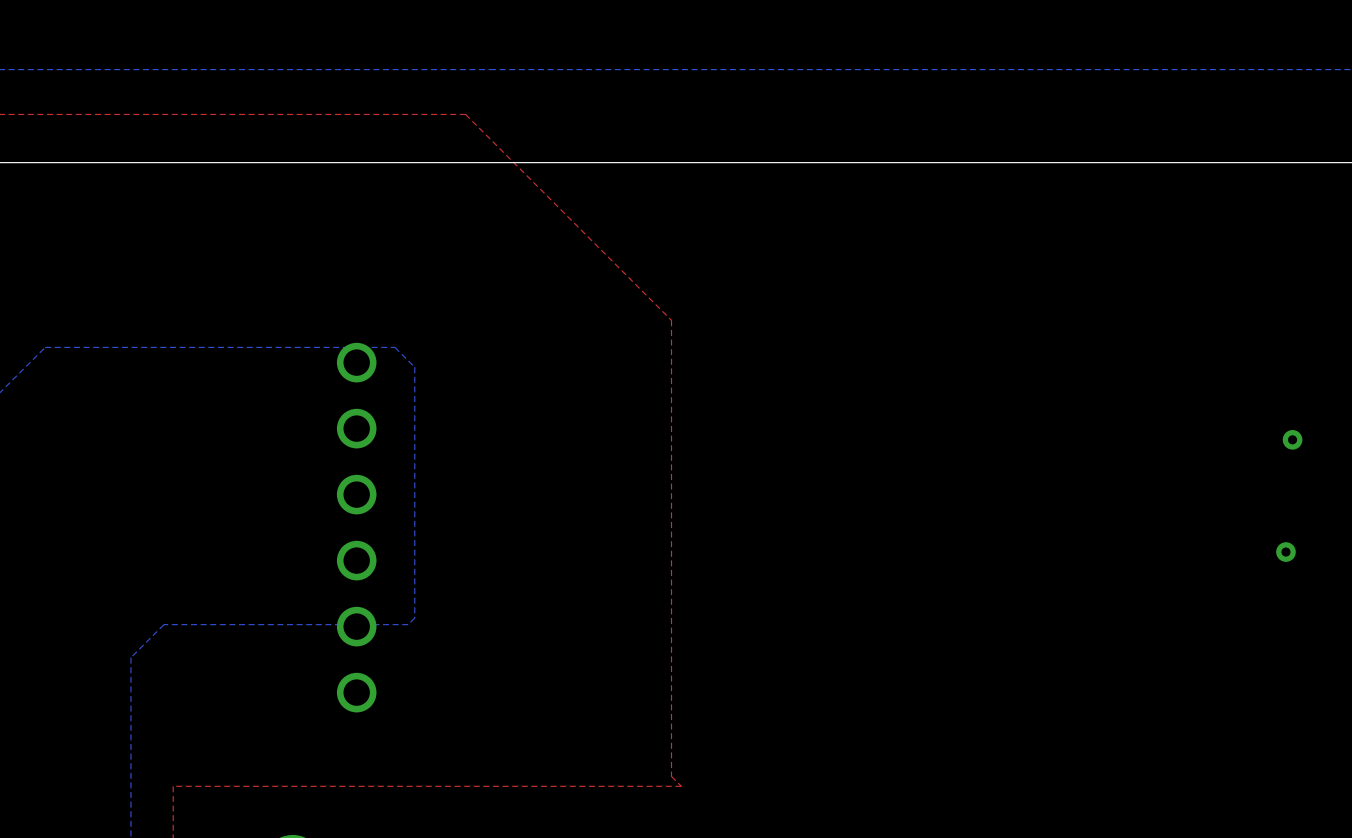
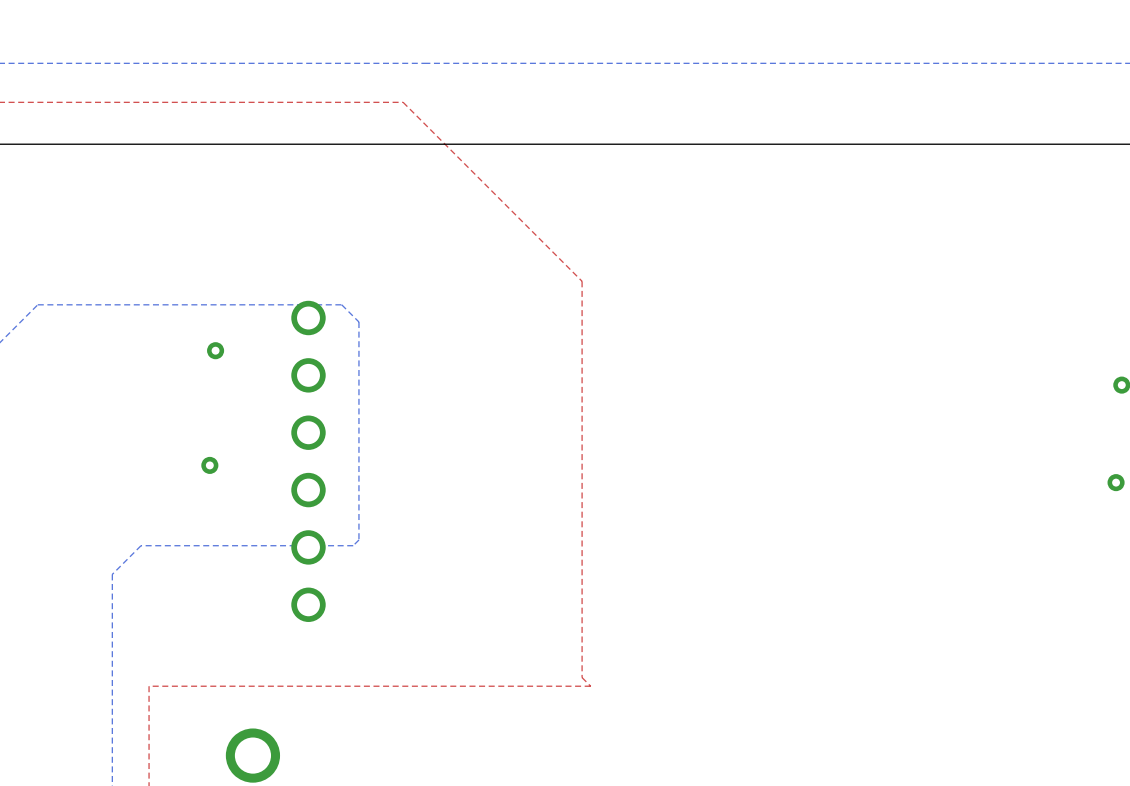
via: none -> (215, 350)
via: none -> (209, 465)

